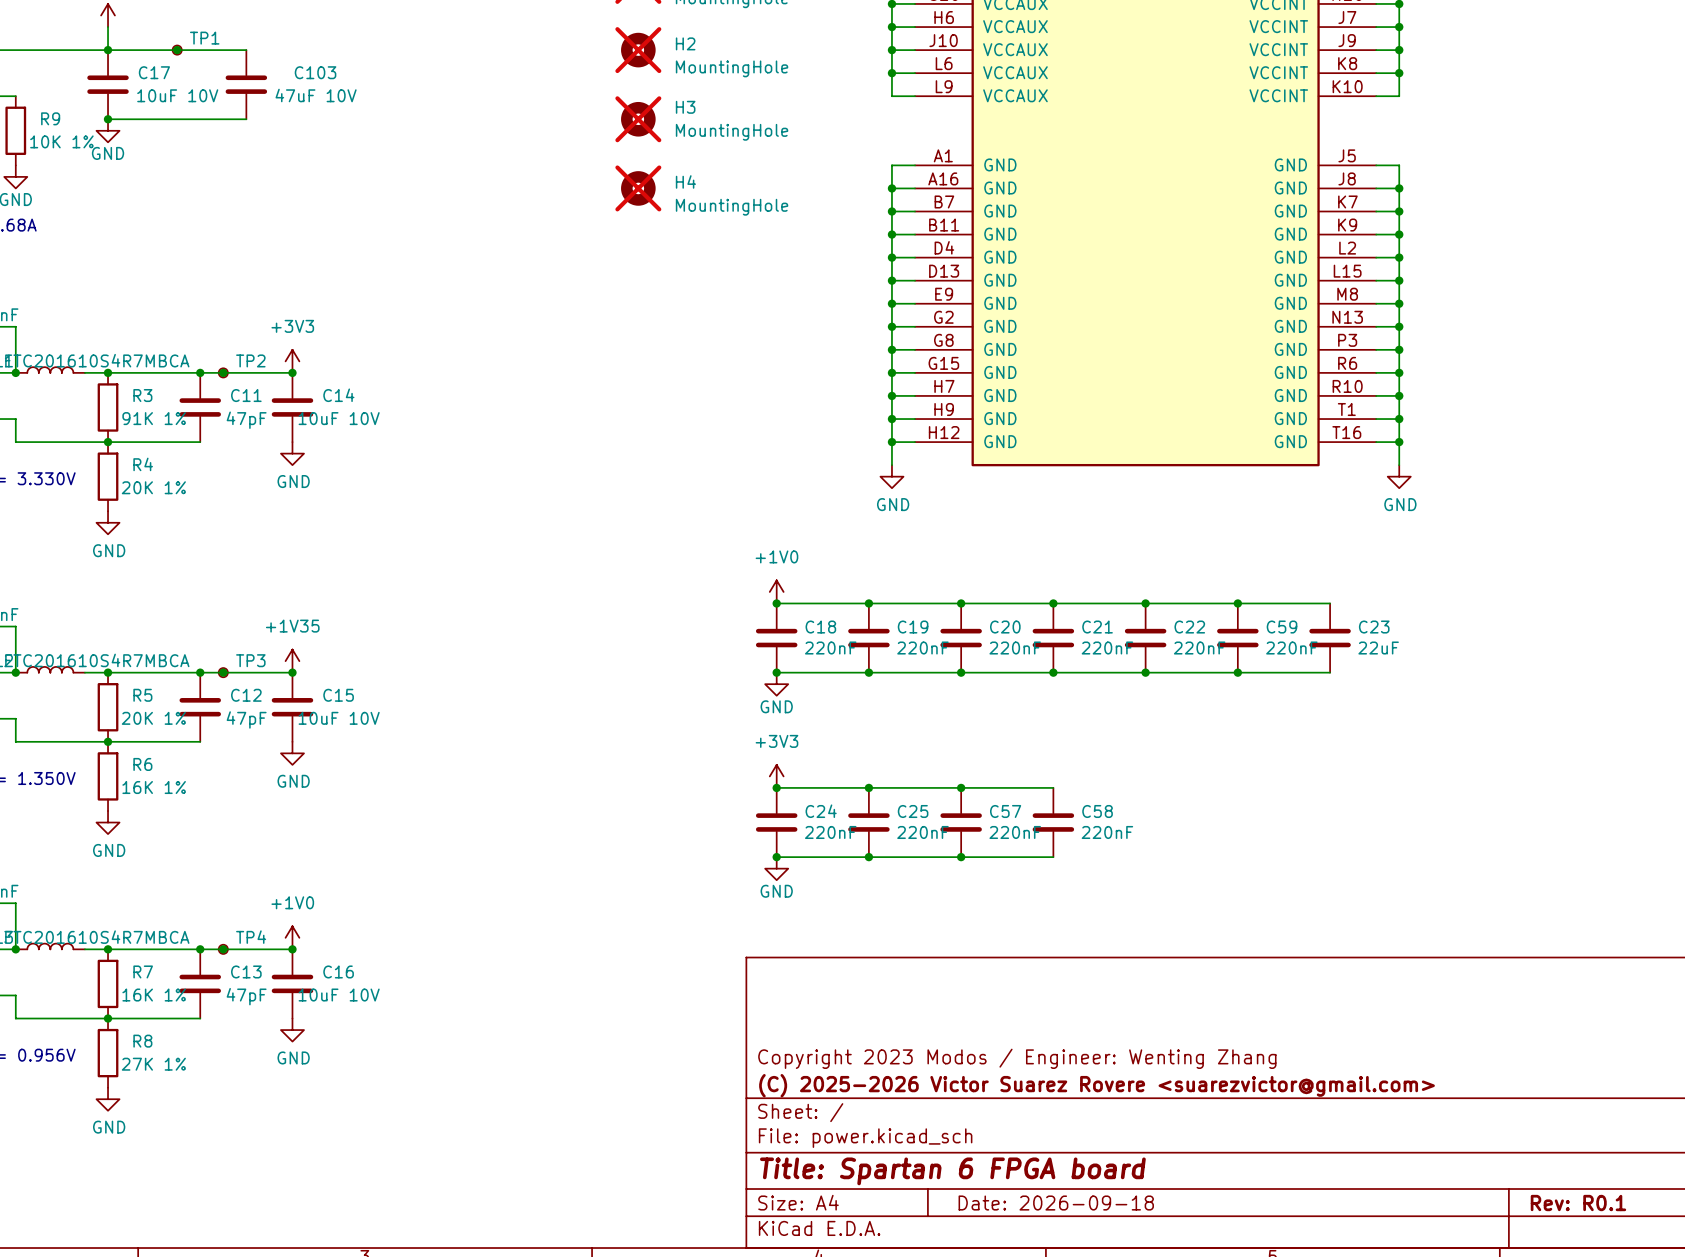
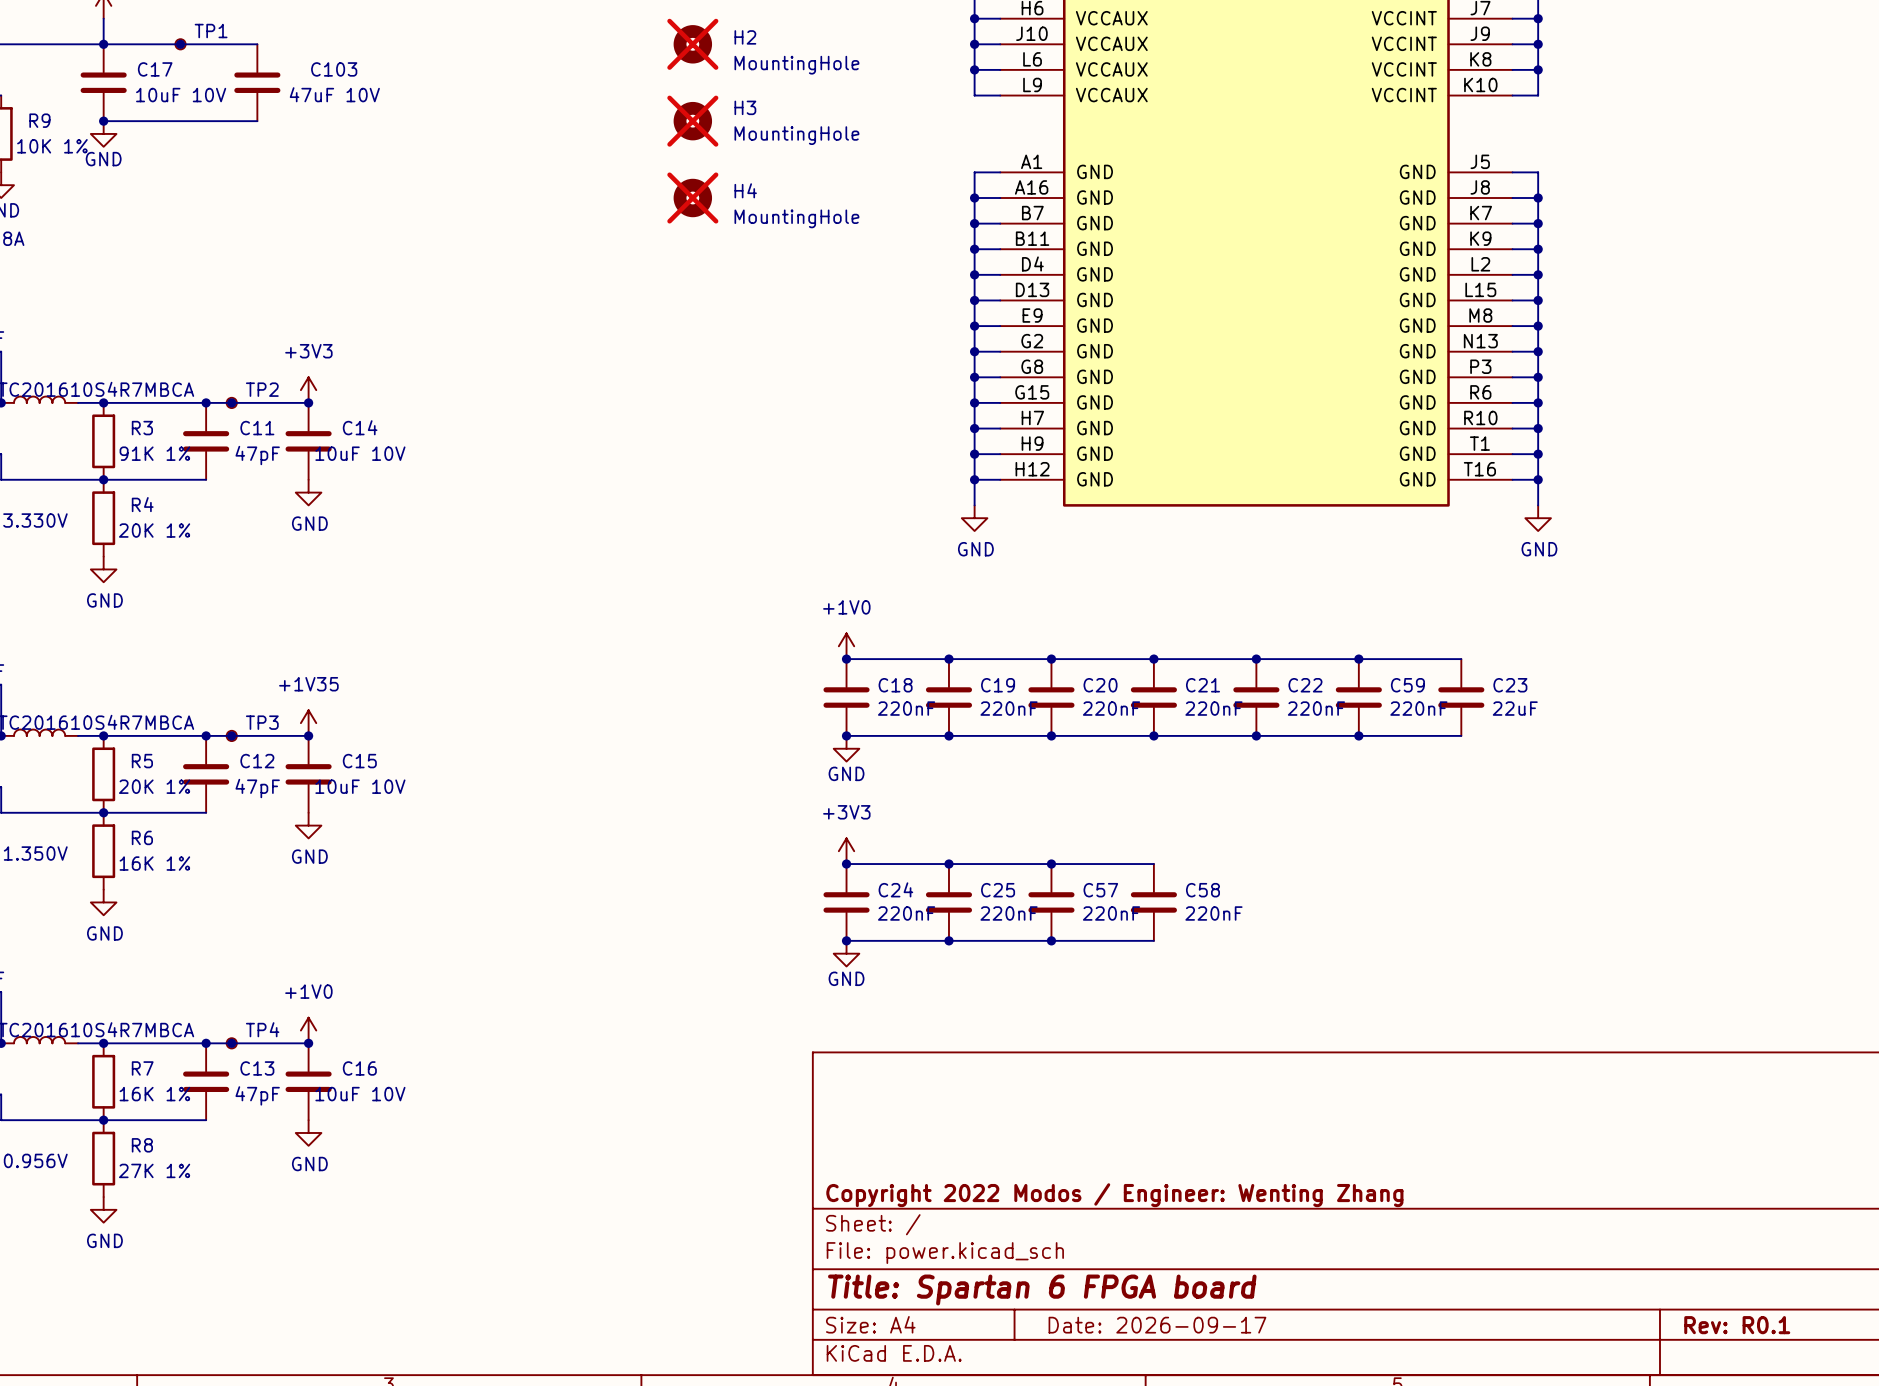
title block: Copyright 2023 Modos / Engineer: Wenting Zhang (1017, 1058) -> none
title block: (C) 2025-2026 Victor Suarez Rovere <suarezvictor@gmail.com> (1097, 1085) -> Copyright 2022 Modos / Engineer: Wenting Zhang (1114, 1195)
title block: Date: 2026-09-18 (1056, 1203) -> Date: 2026-09-17 (1157, 1325)

